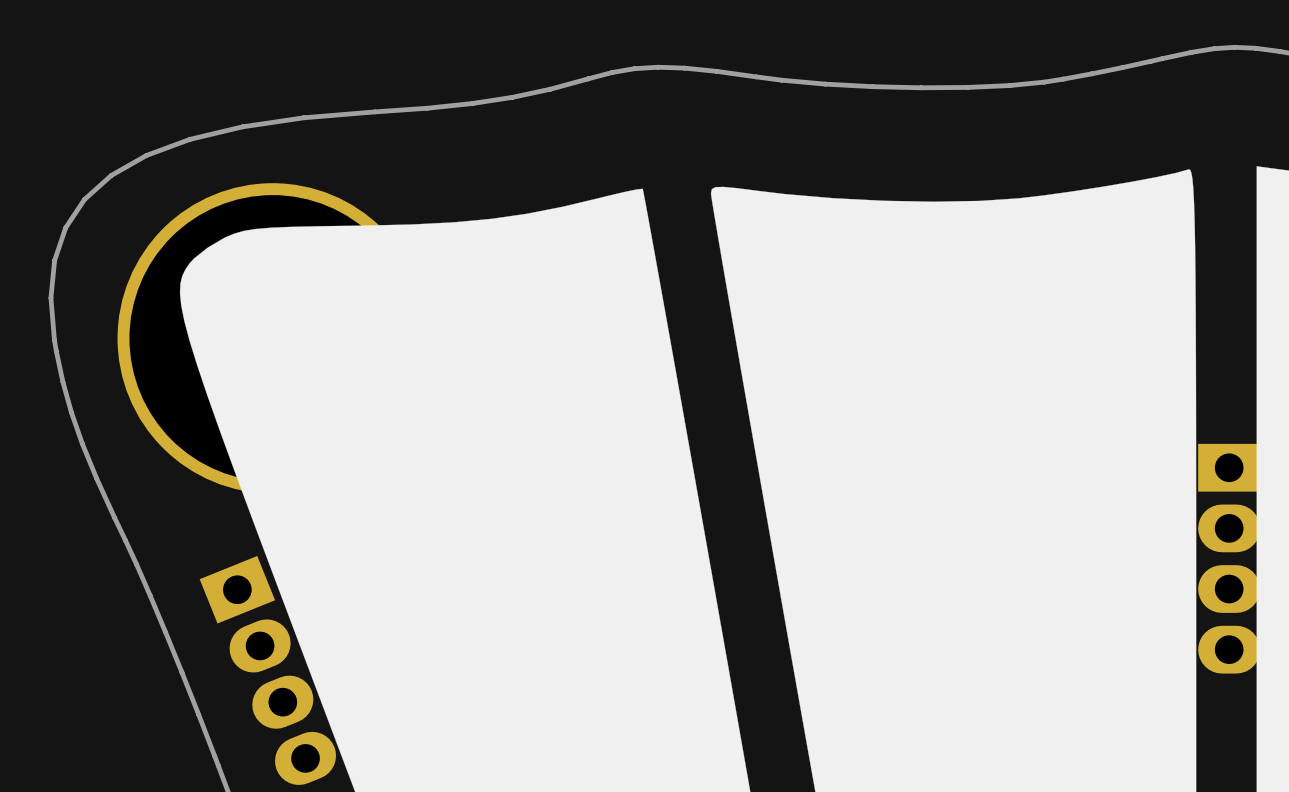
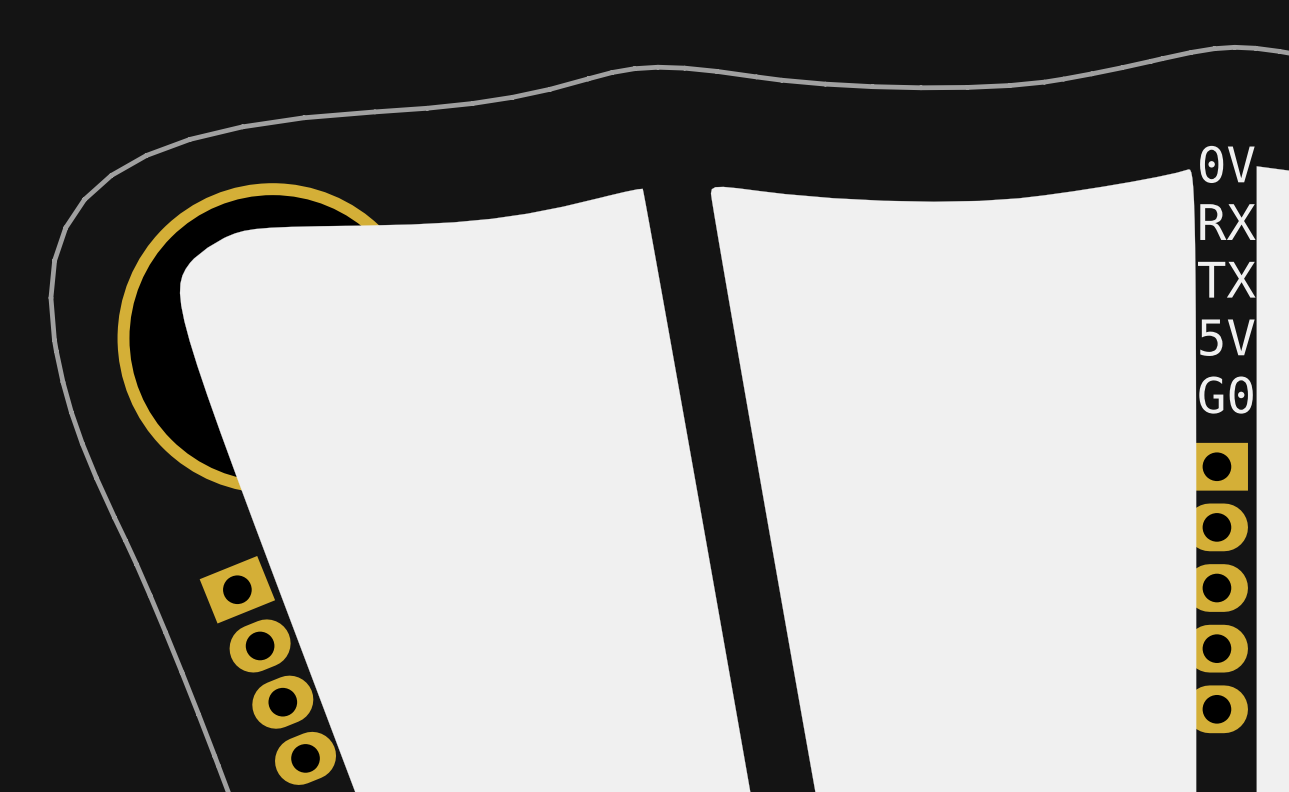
text: none -> 0V (1227, 164)
text: none -> RX (1227, 222)
text: none -> TX (1226, 279)
text: none -> 5V (1227, 337)
text: none -> G0 (1226, 395)
part: (1229, 558) -> none
part: none -> (1216, 588)

